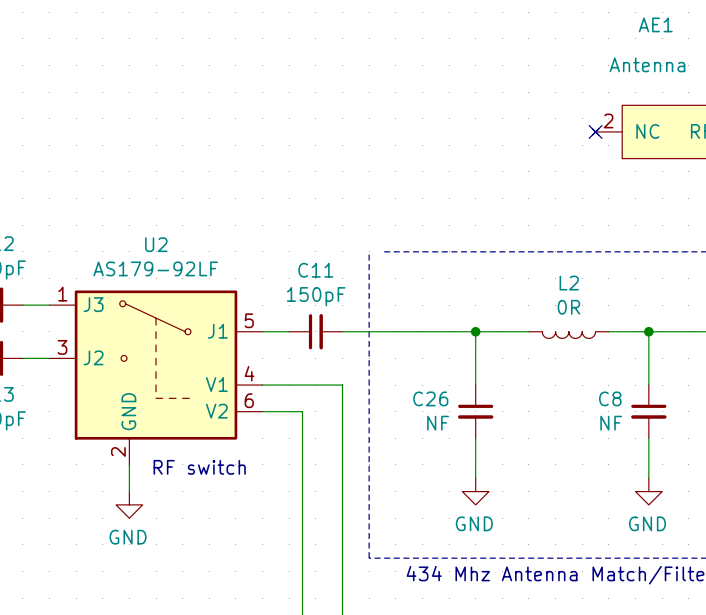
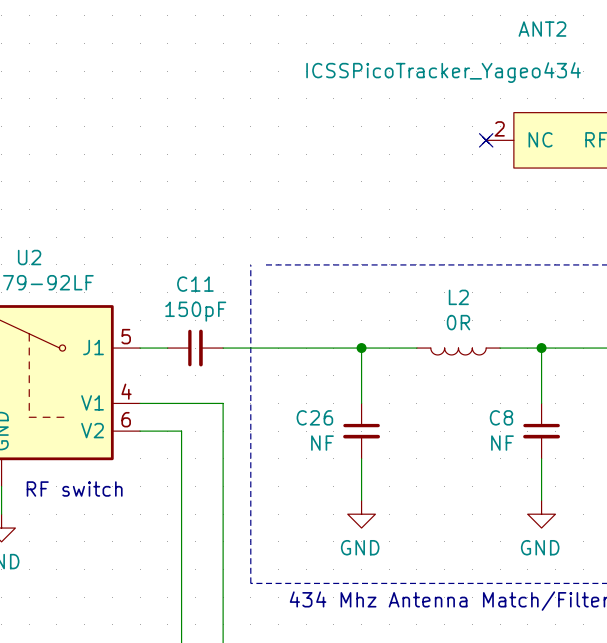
AE1 name: AE1 (655, 24) -> ANT2 (542, 29)
AE1 value: Antenna (647, 64) -> ICSSPicoTracker_Yageo434 (443, 72)

